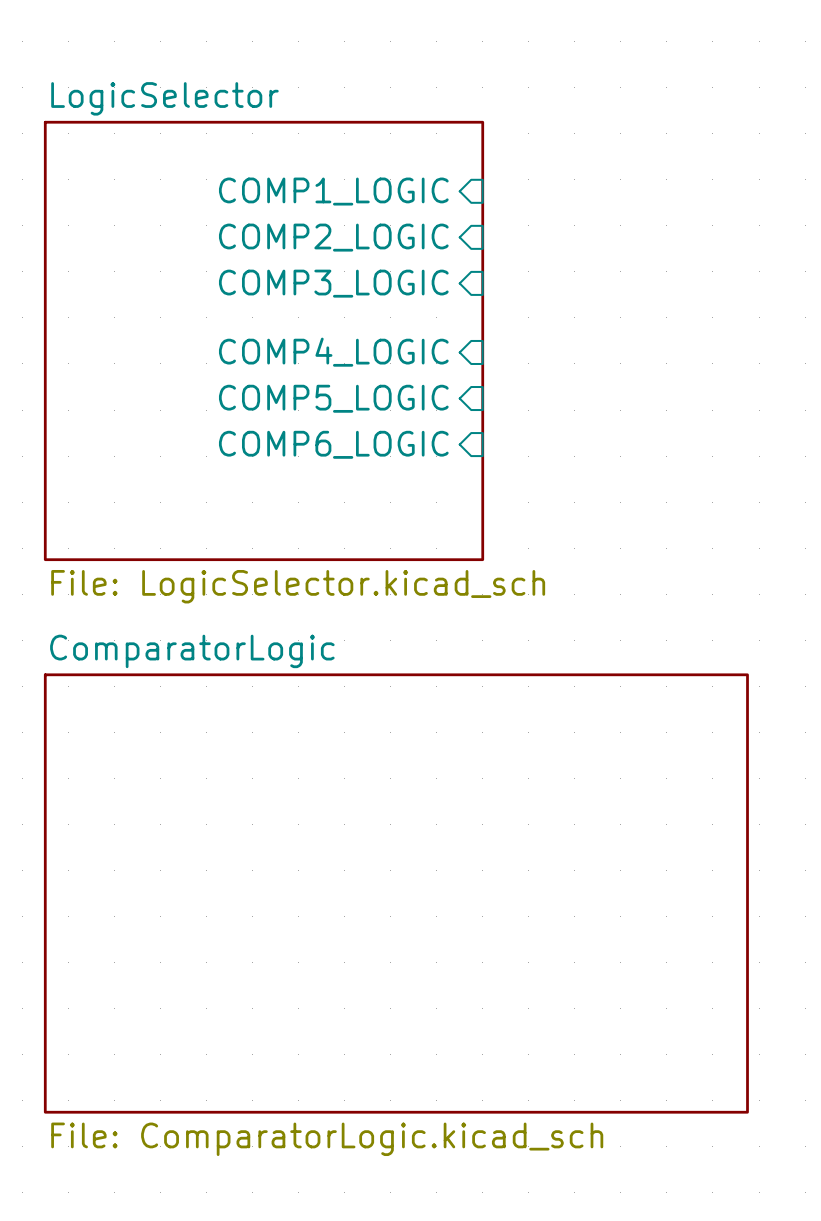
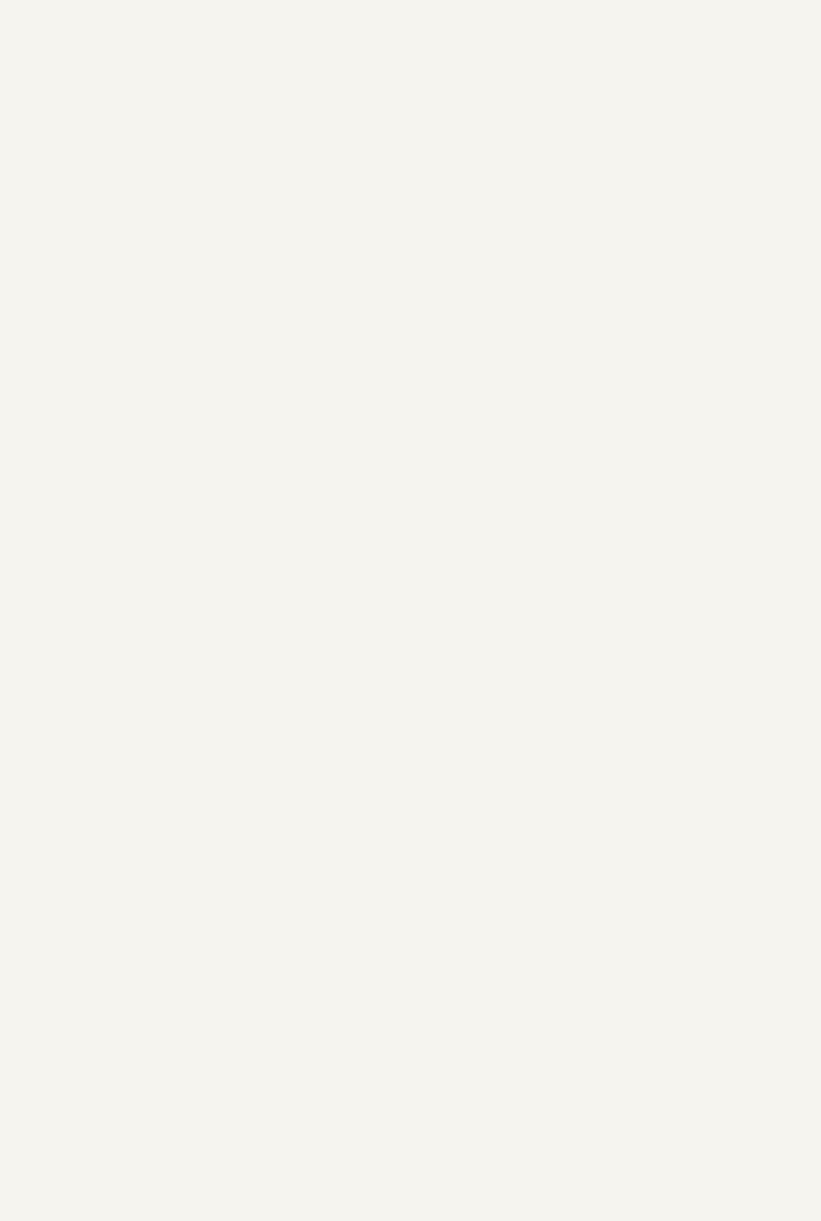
sheet pin: COMP1_LOGIC (333, 191) -> none
sheet pin: COMP2_LOGIC (333, 237) -> none
sheet pin: COMP3_LOGIC (333, 283) -> none
sheet LogicSelector: File: LogicSelector.kicad_sch (264, 340) -> none
sheet pin: COMP4_LOGIC (333, 352) -> none
sheet pin: COMP5_LOGIC (333, 398) -> none
sheet pin: COMP6_LOGIC (333, 444) -> none
sheet ComparatorLogic: File: ComparatorLogic.kicad_sch (396, 893) -> none

